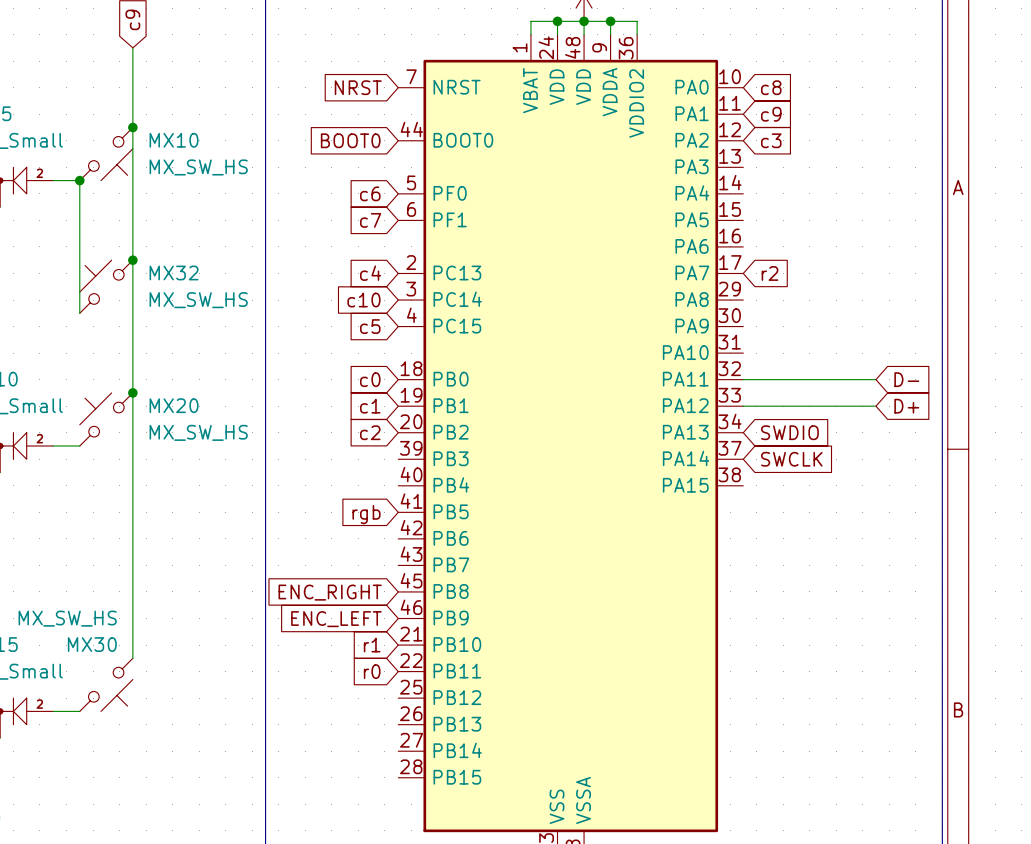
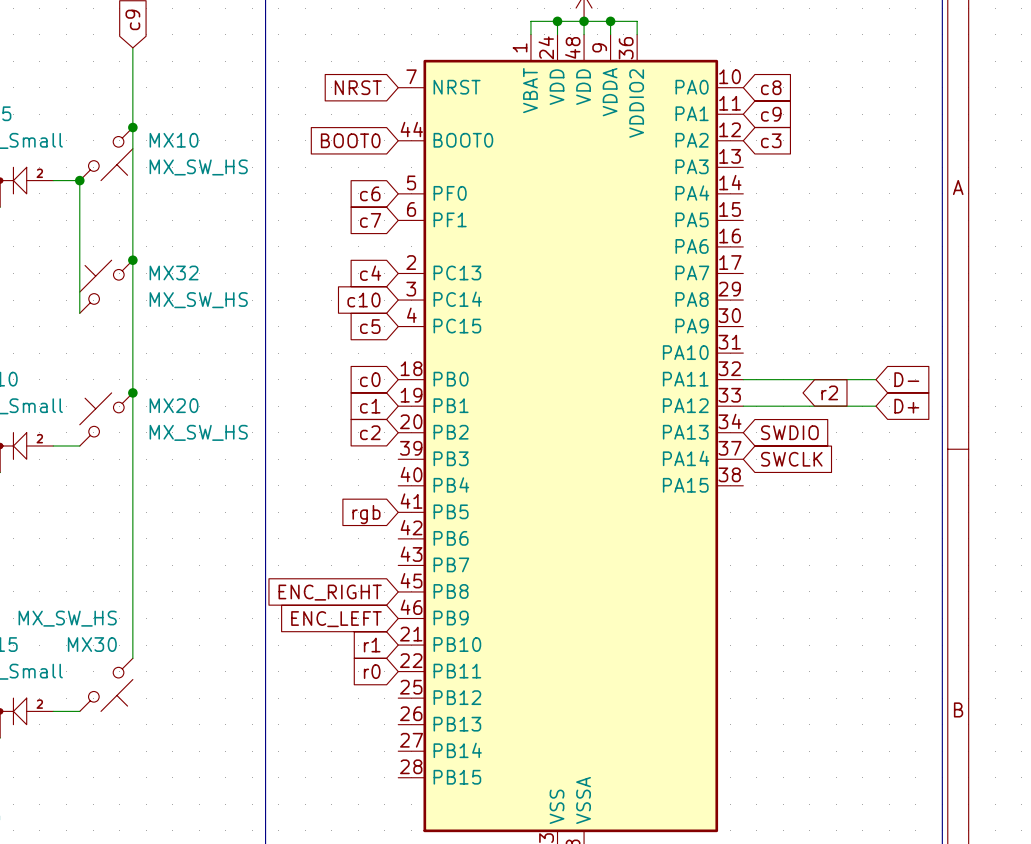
global label position: r2 (770, 273) -> r2 (829, 392)

